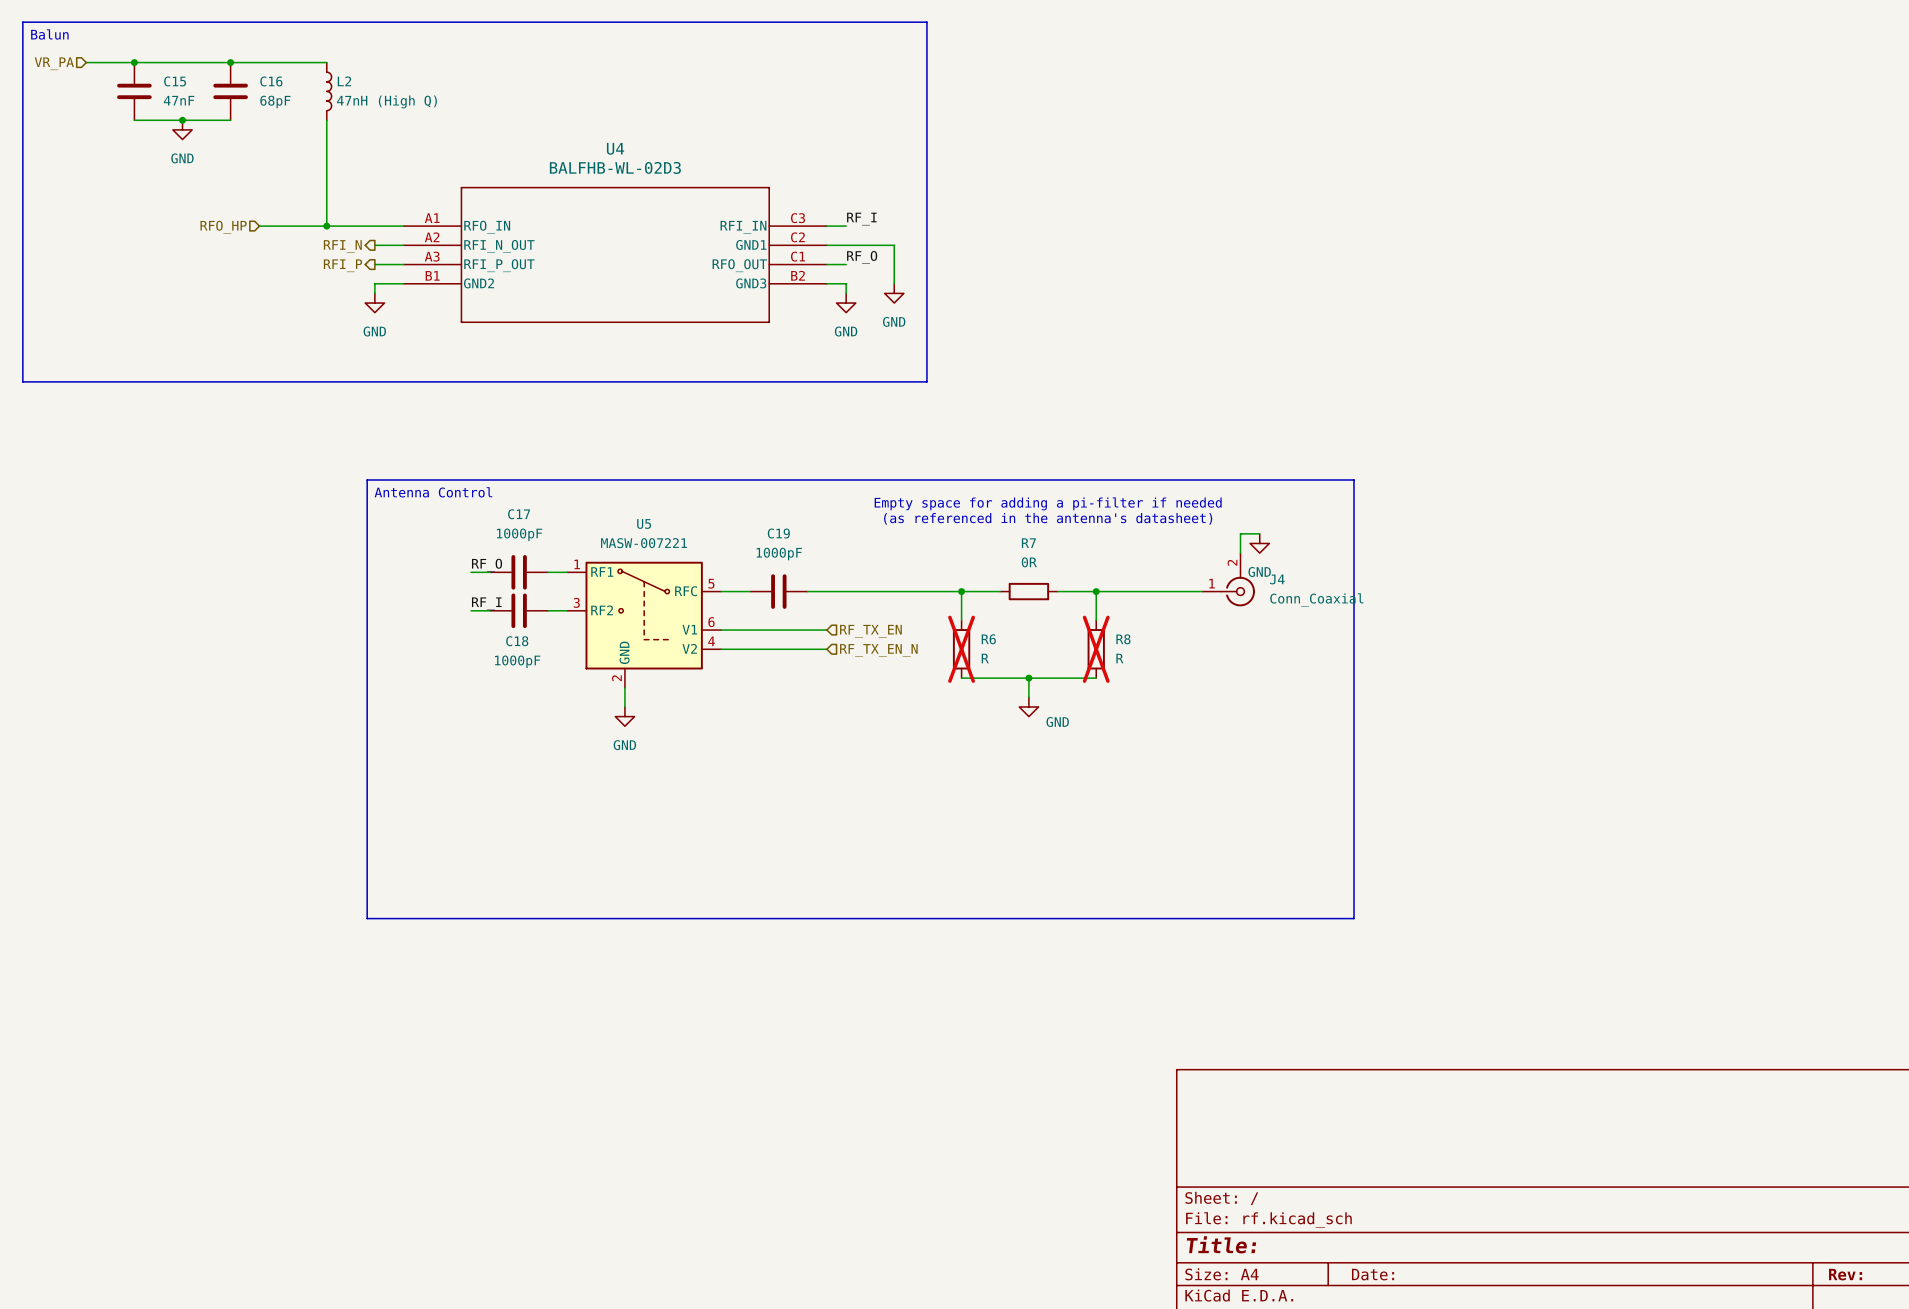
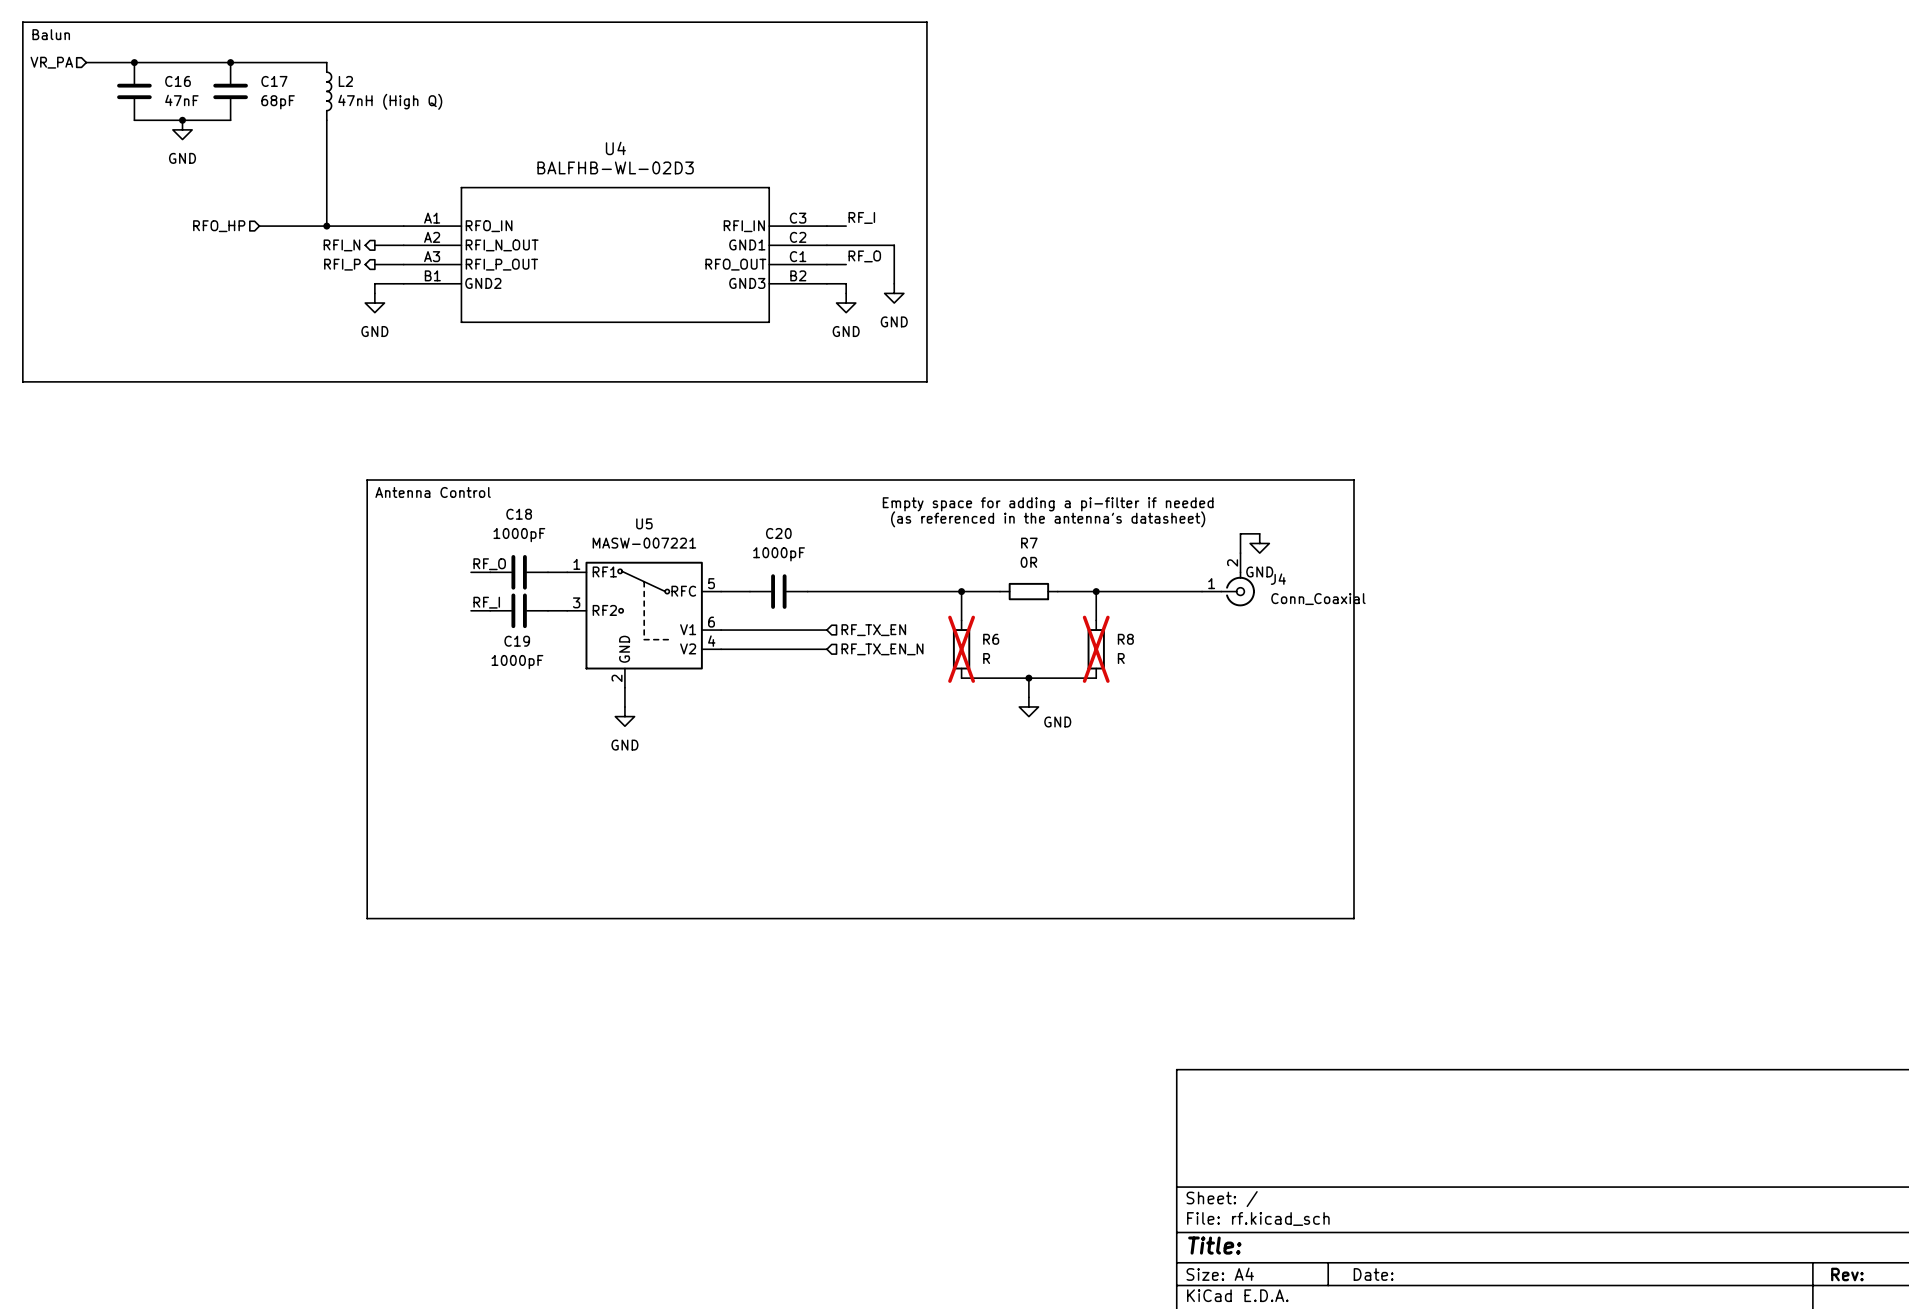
C15 name: C15 (175, 81) -> C16 (178, 81)
C16 name: C16 (271, 81) -> C17 (274, 81)
C17 name: C17 (519, 514) -> C18 (519, 514)
C19 name: C19 (778, 533) -> C20 (778, 533)
C18 name: C18 (517, 641) -> C19 (517, 641)

